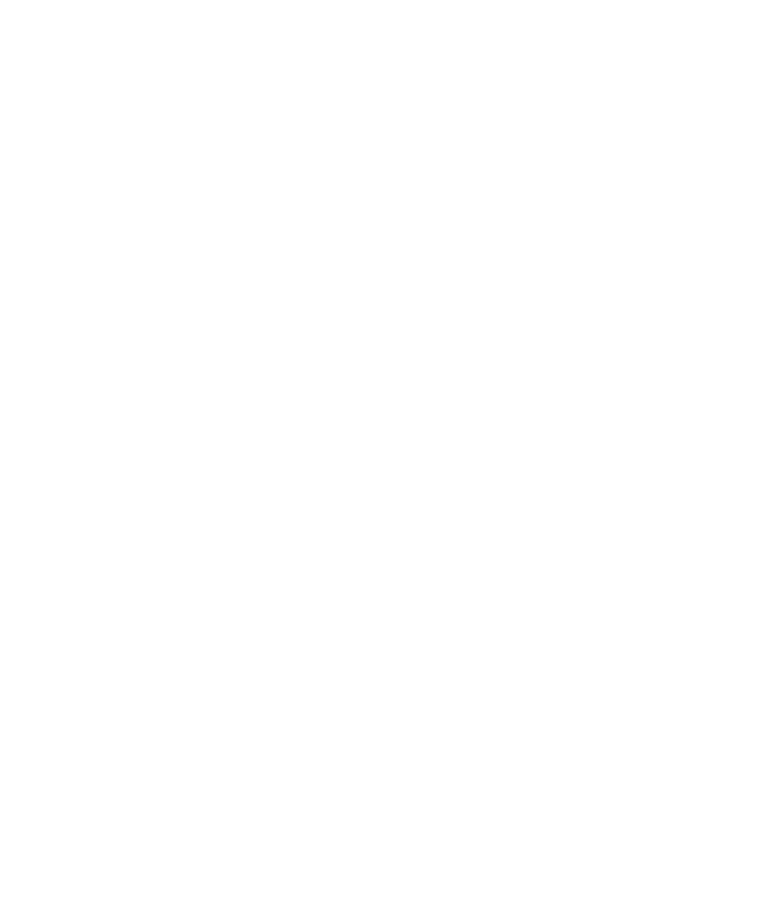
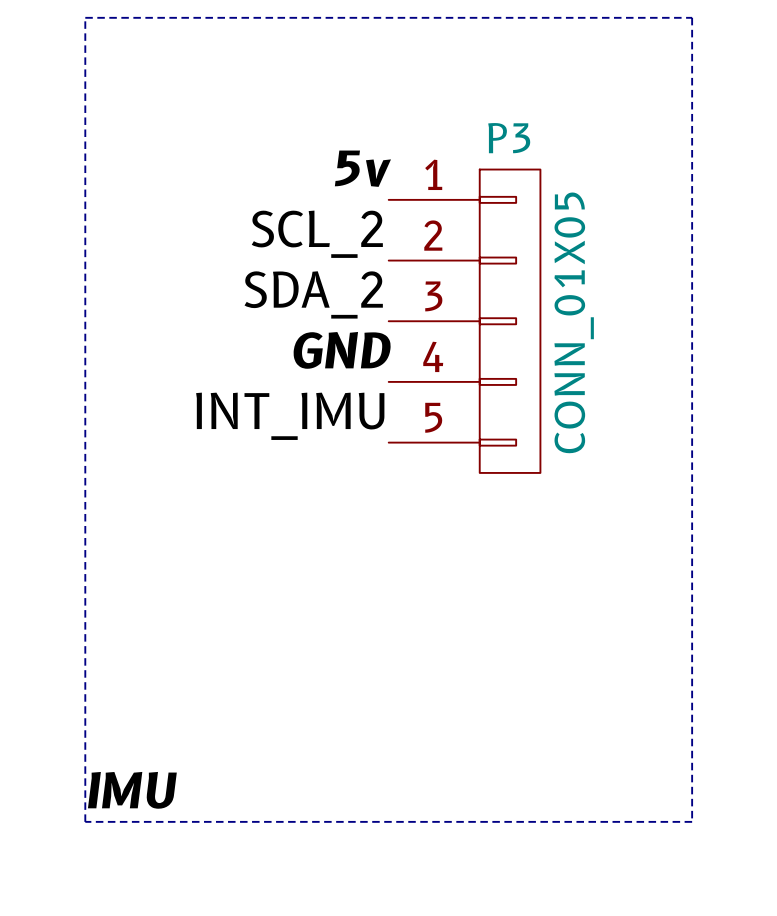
line: none -> (85, 17) (692, 17) (692, 821) (85, 821) (85, 17)
label: none -> 5v (362, 168)
label: none -> SCL_2 (317, 234)
label: none -> SDA_2 (313, 294)
P3: none -> CONN_01X05 (464, 321)
label: none -> GND (342, 350)
label: none -> INT_IMU (290, 416)
label: none -> IMU (132, 790)

